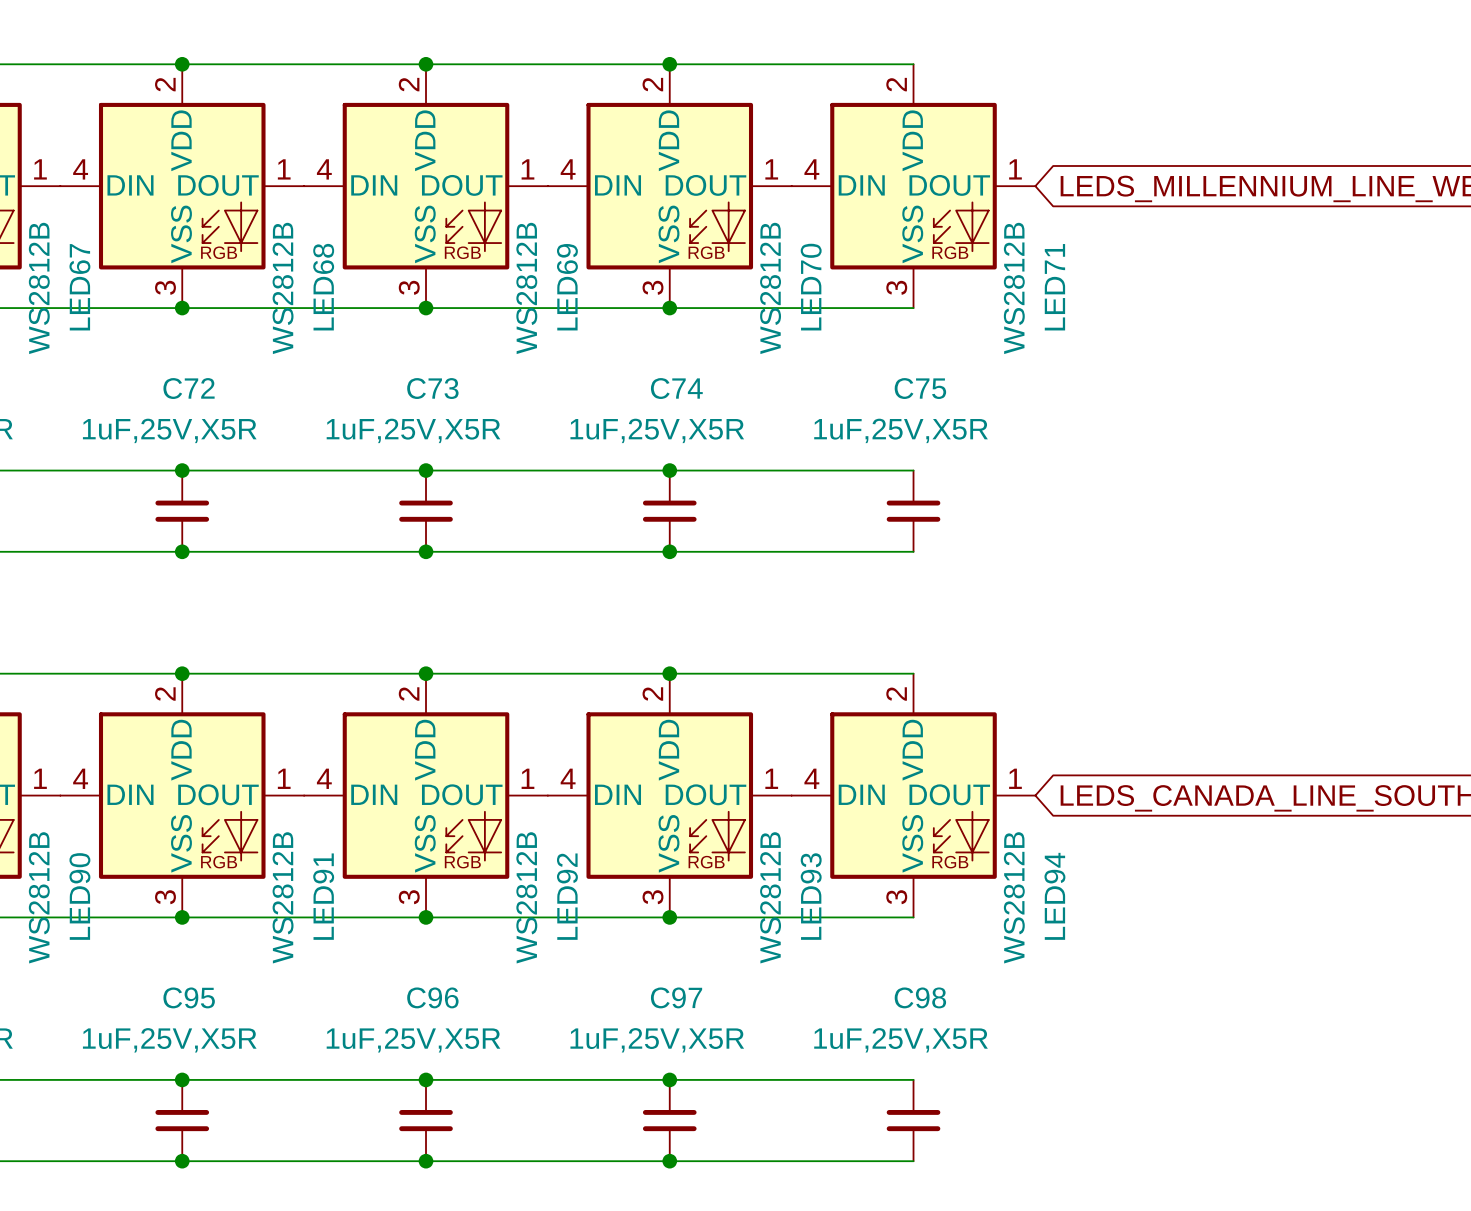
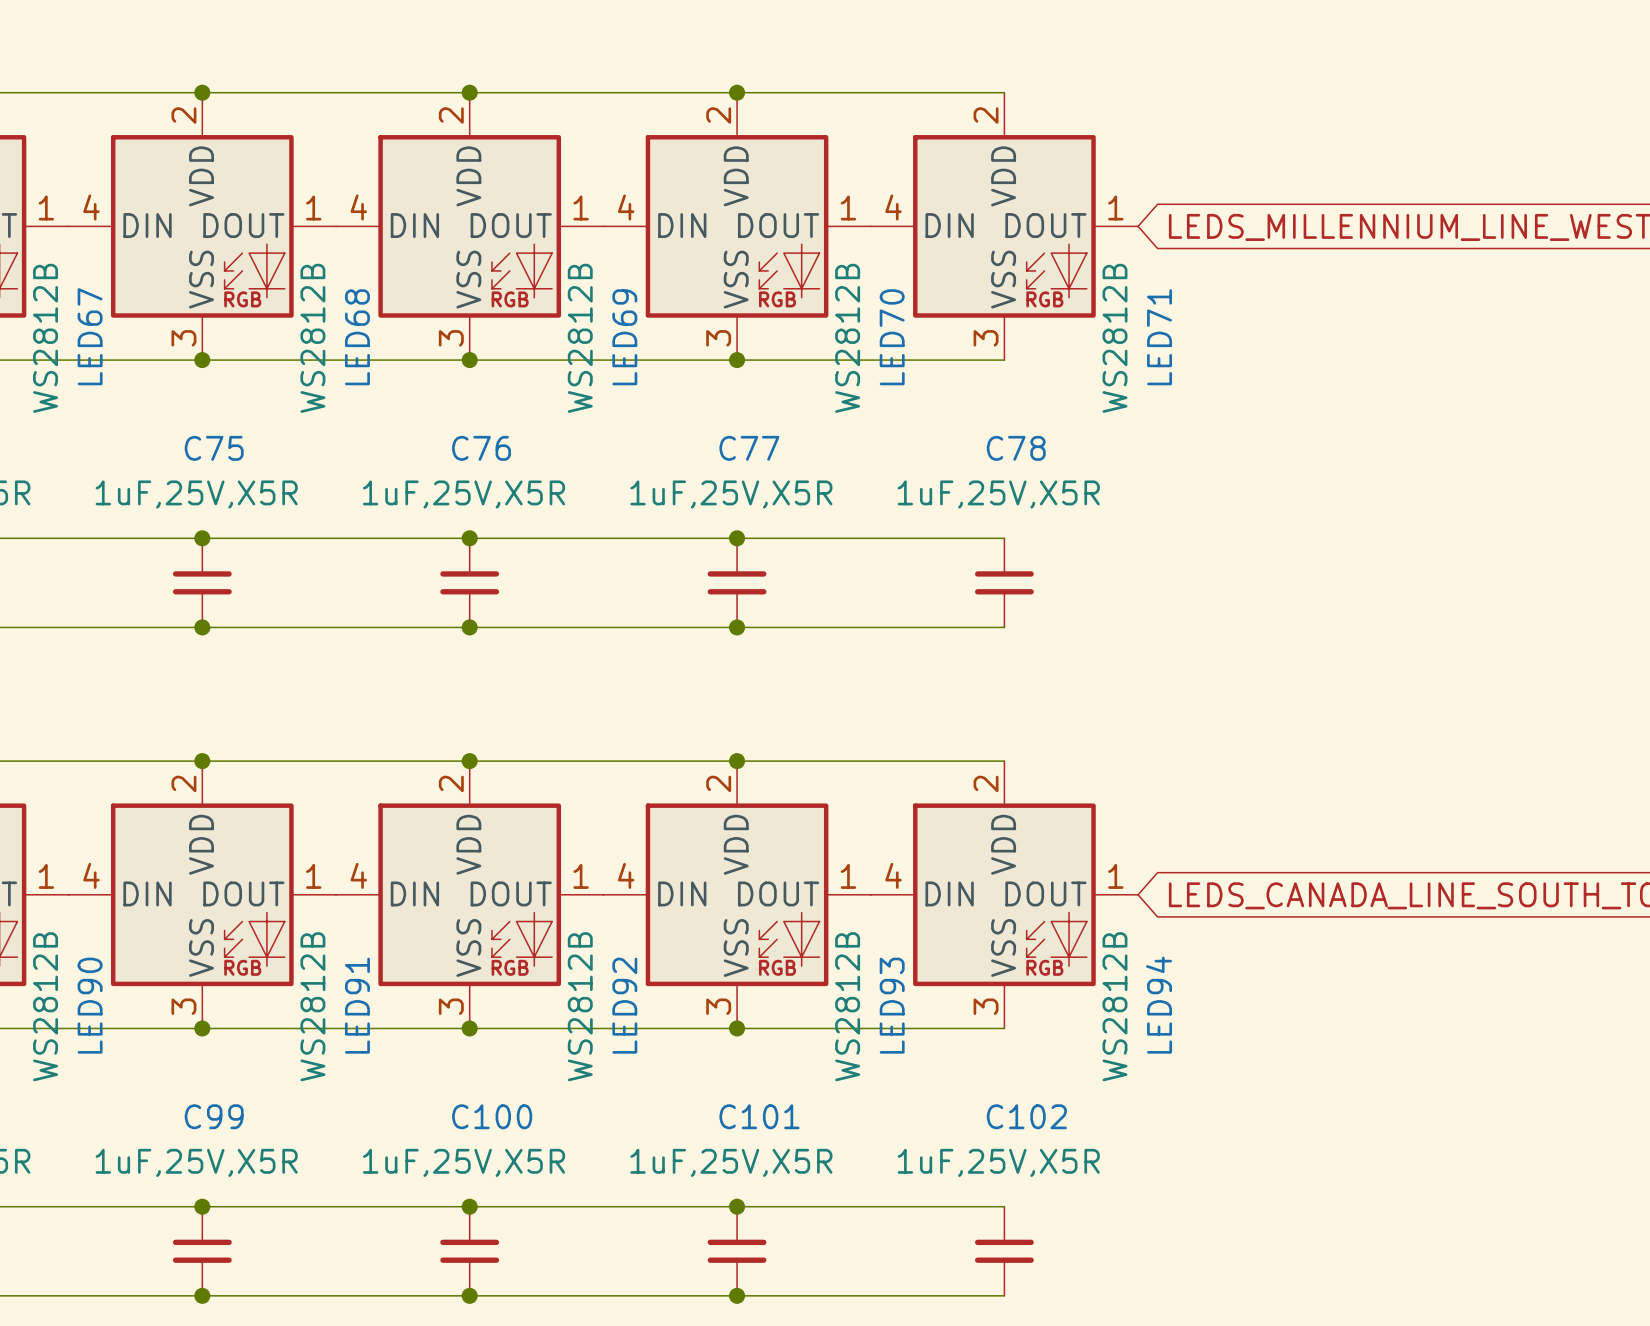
C72 name: C72 (189, 388) -> C75 (214, 448)
C73 name: C73 (432, 388) -> C76 (481, 448)
C74 name: C74 (676, 388) -> C77 (749, 448)
C75 name: C75 (920, 388) -> C78 (1016, 448)
C95 name: C95 (189, 997) -> C99 (214, 1116)
C96 name: C96 (432, 997) -> C100 (492, 1116)
C97 name: C97 (676, 997) -> C101 (759, 1116)
C98 name: C98 (920, 997) -> C102 (1026, 1116)

